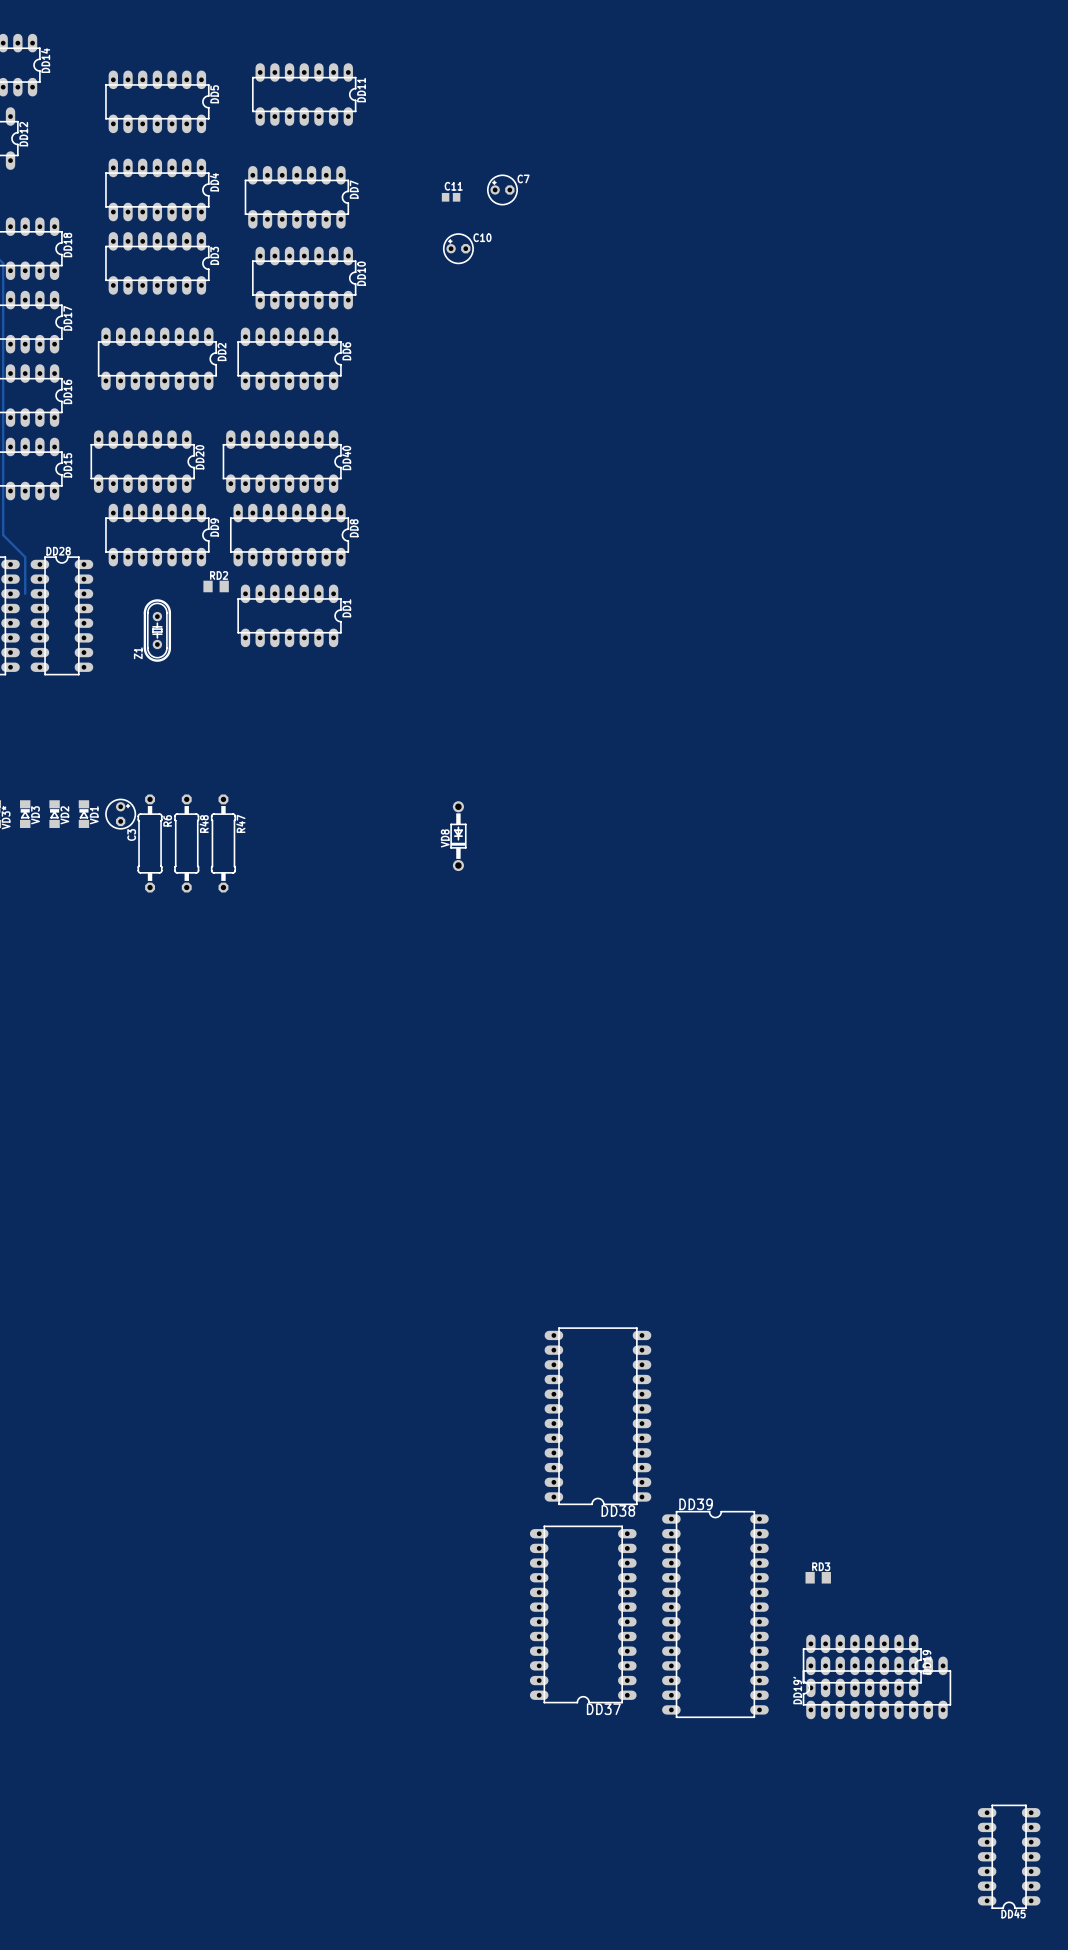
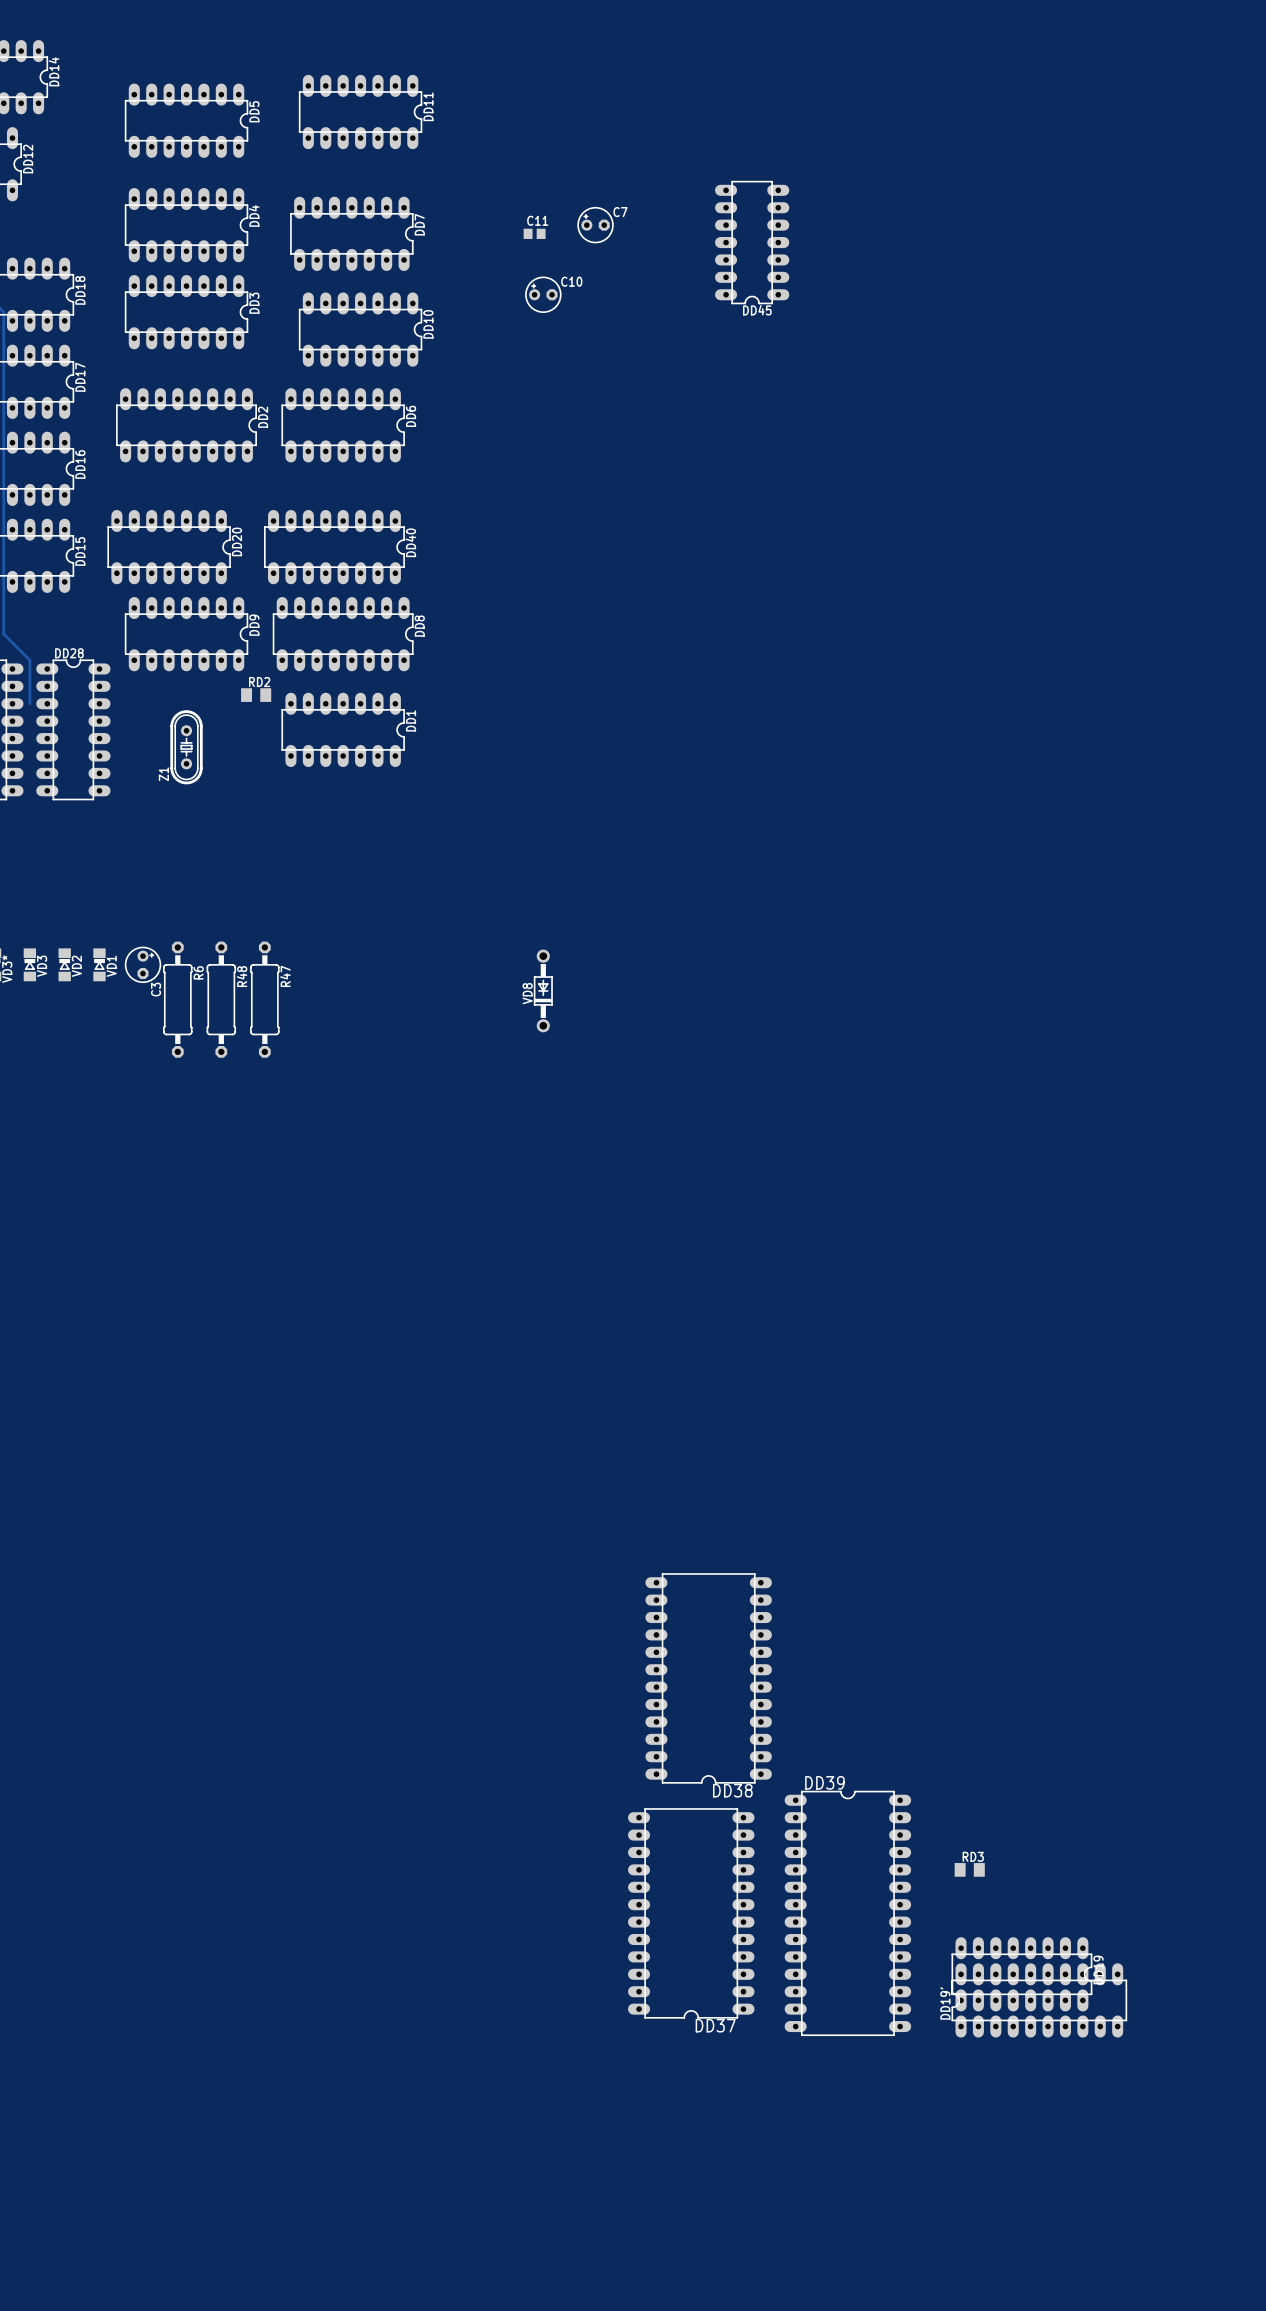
DD45 position: (1009, 1856) -> (752, 242)

